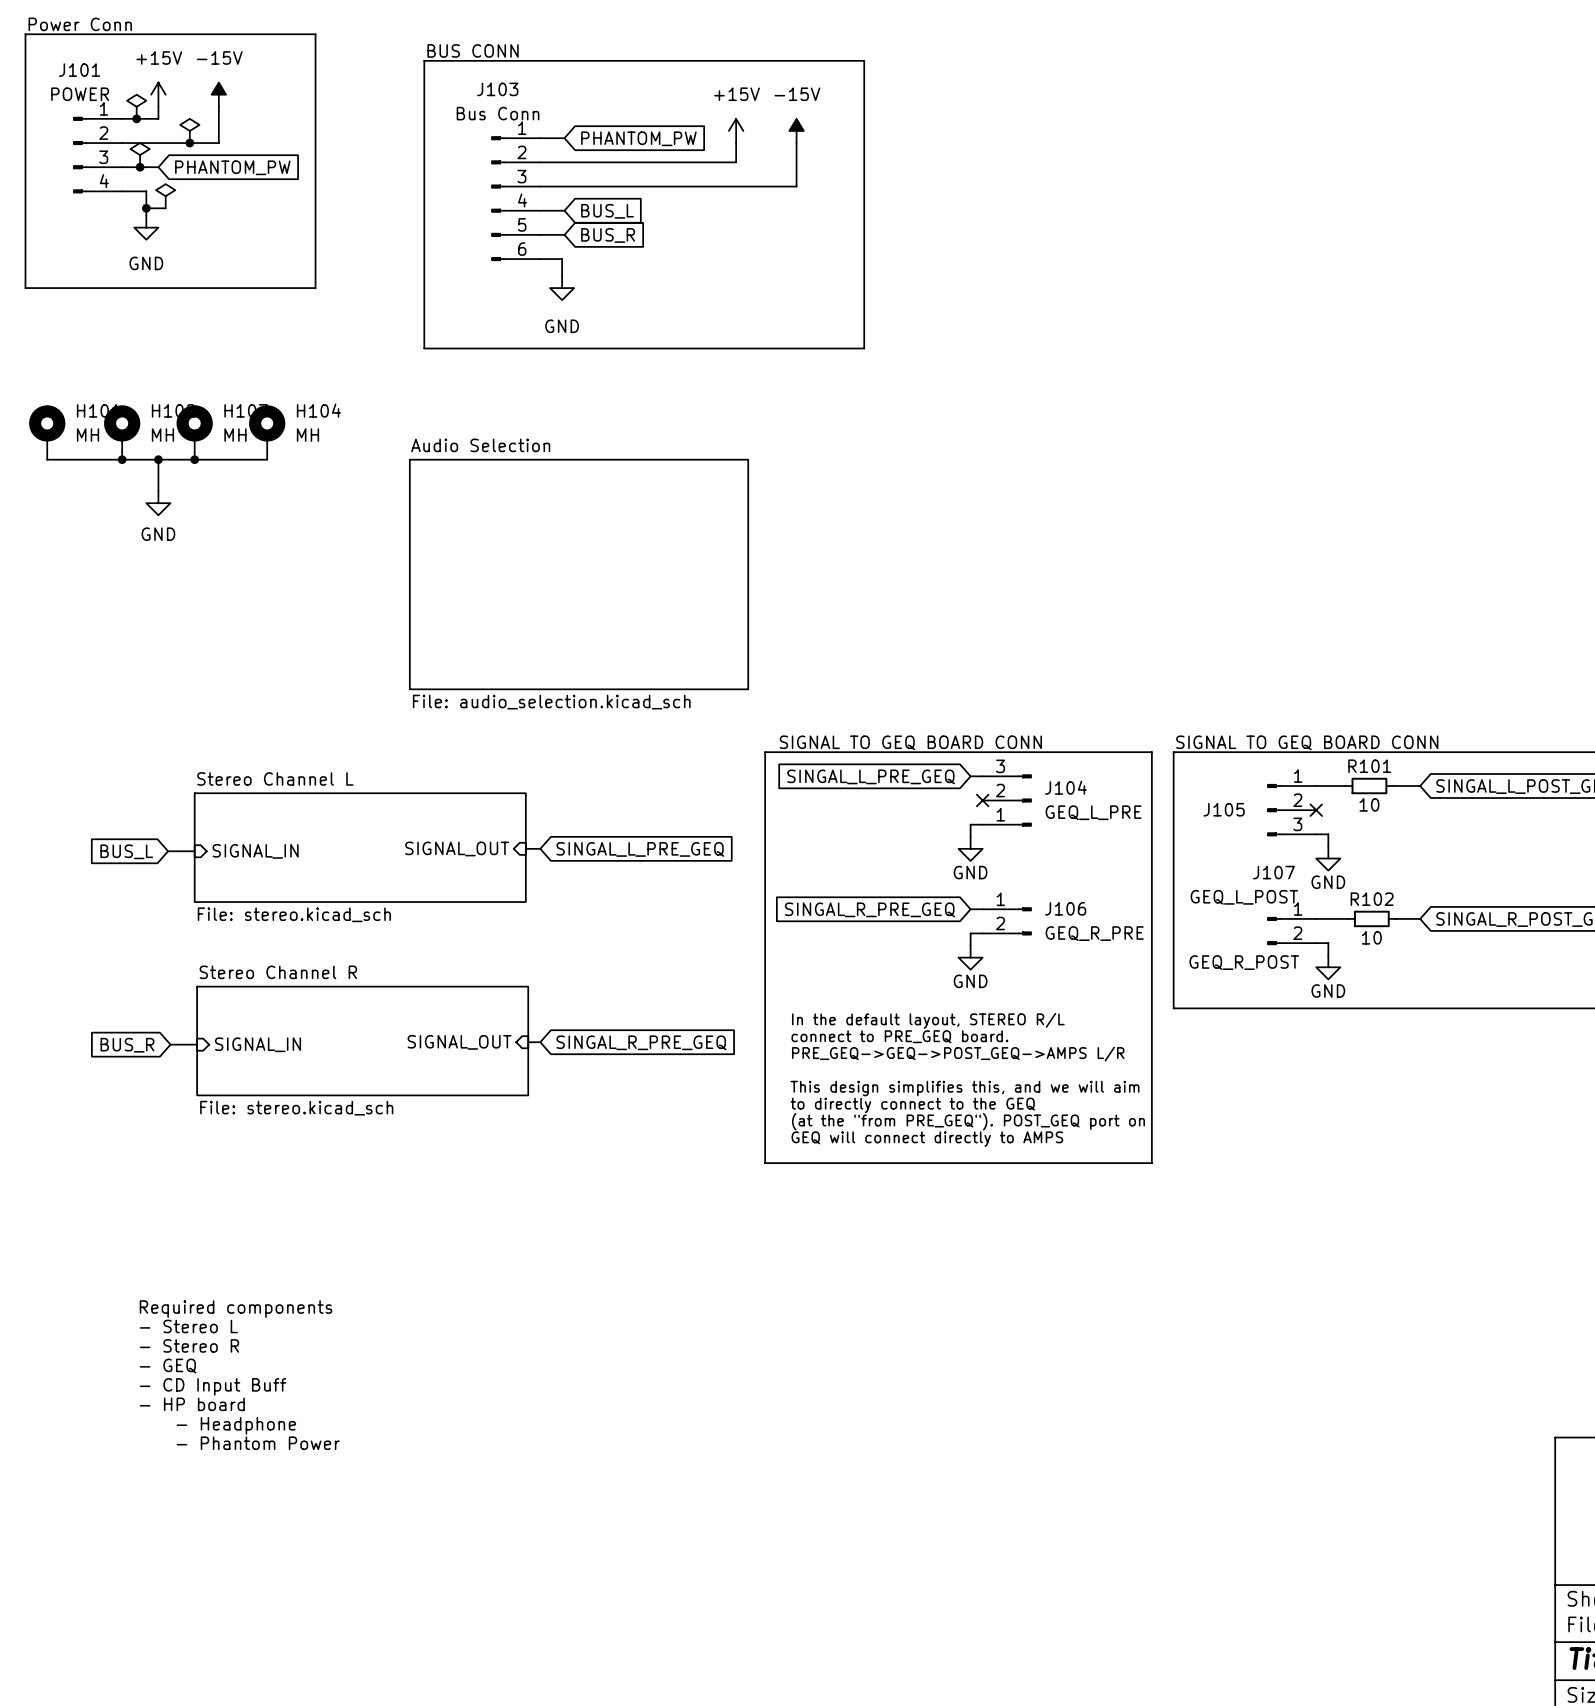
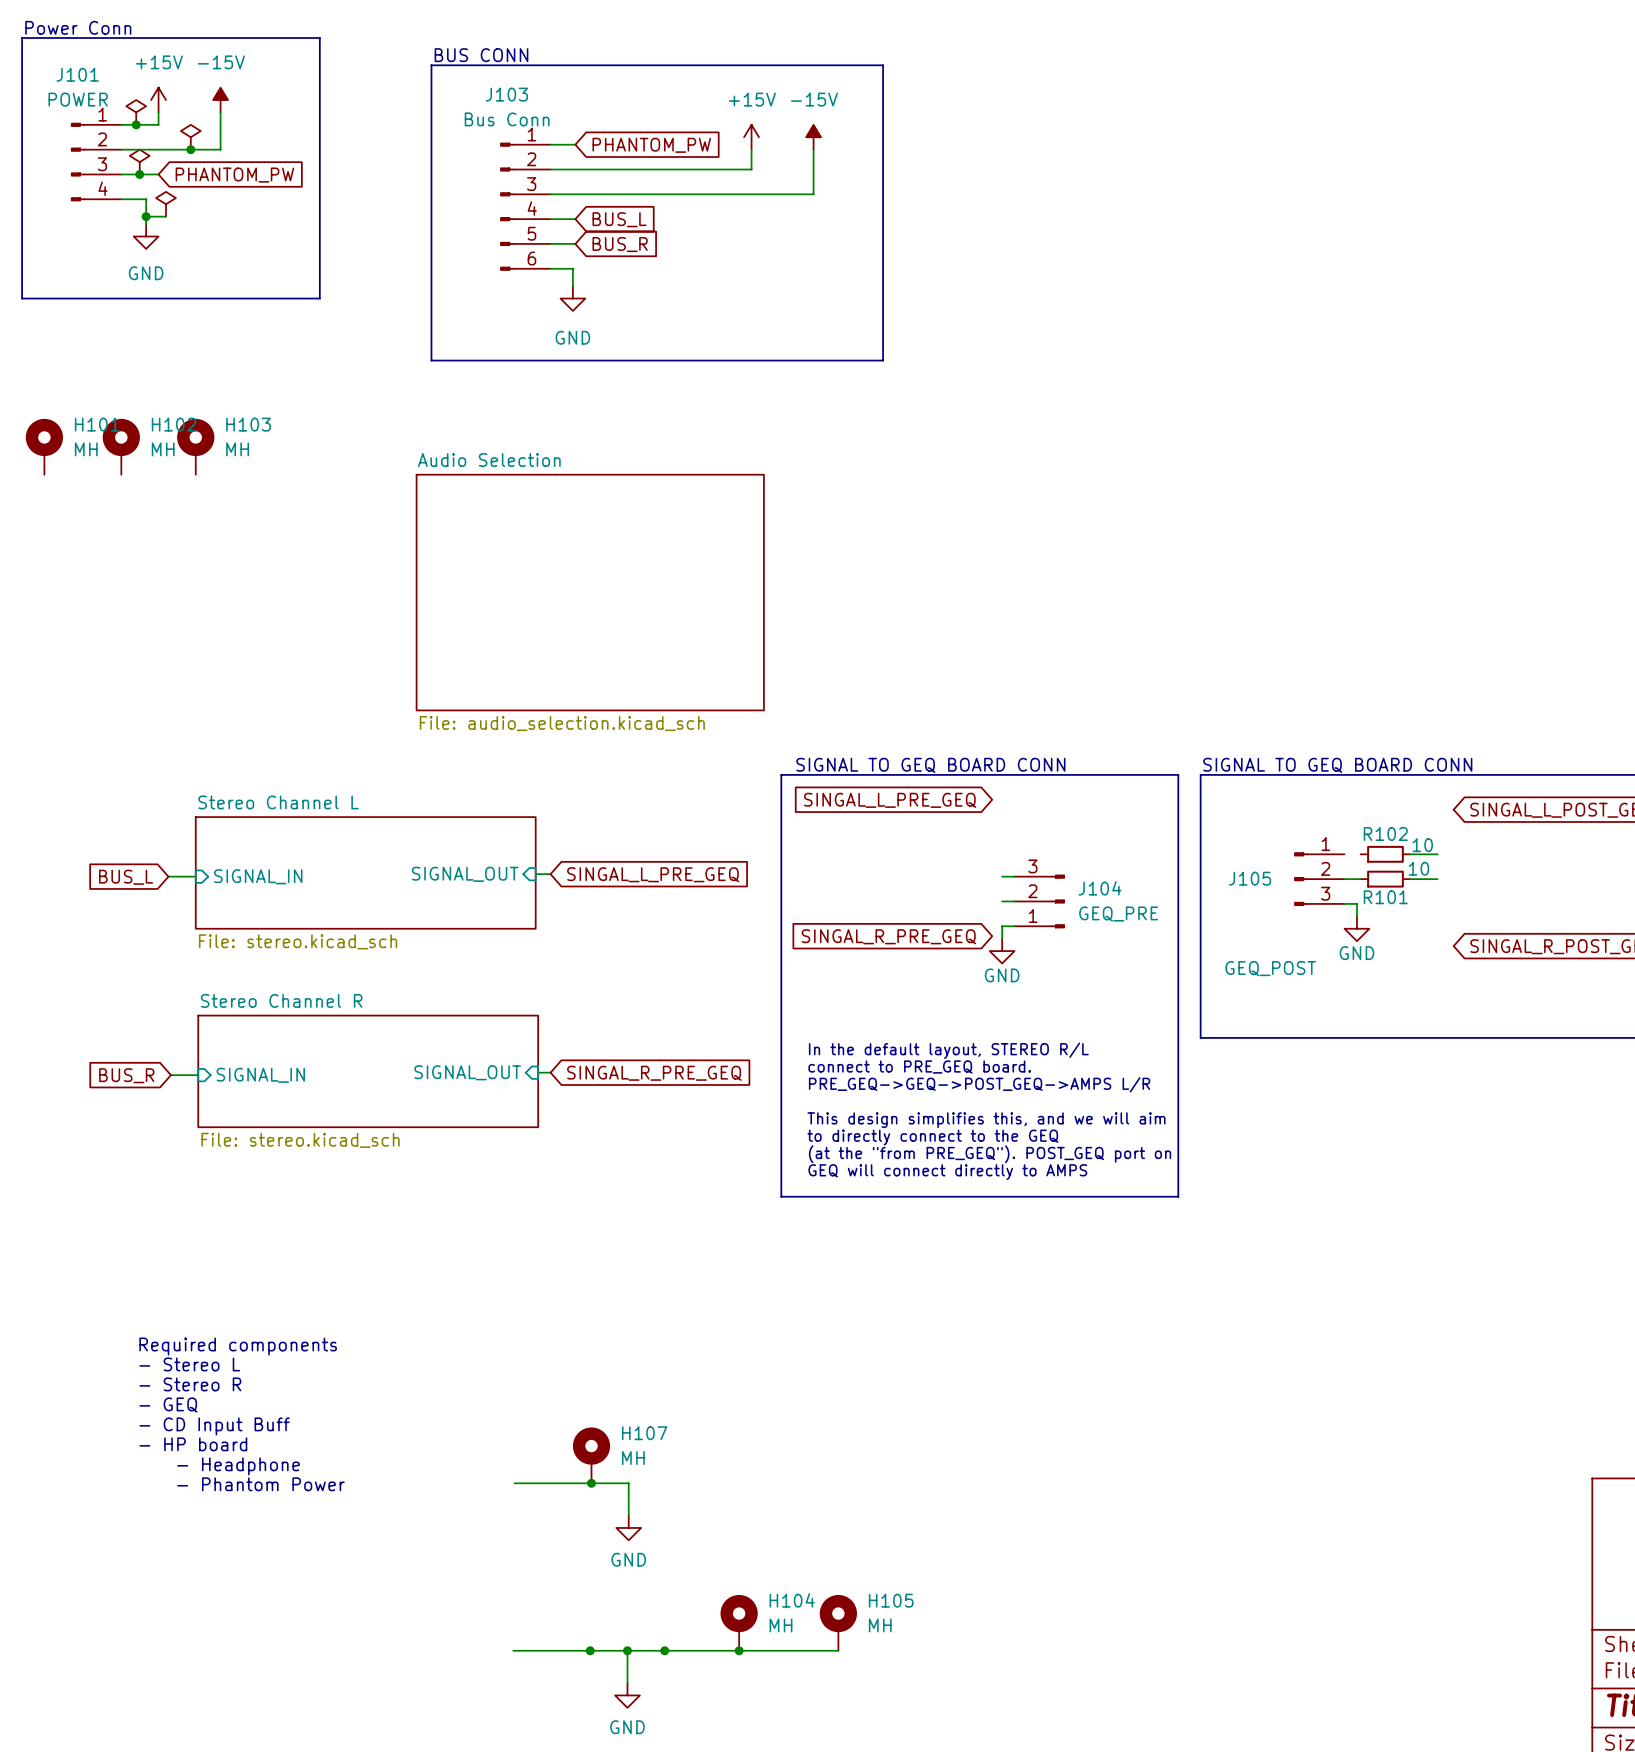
H104 position: (267, 432) -> (739, 1622)
wire: (47, 459) (267, 459) -> none
junction: (122, 459) -> none
wire: (158, 459) (158, 491) -> none
junction: (158, 459) -> none
junction: (194, 459) -> none
power symbol: GND (158, 503) -> none
R101 name position: R101 (1369, 766) -> R101 (1385, 897)
wire: (970, 776) (982, 776) -> (1002, 876) (1014, 876)
wire: (1316, 786) (1345, 786) -> none
R101 position: (1369, 786) -> (1385, 879)
wire: (1393, 786) (1420, 786) -> (1410, 854) (1437, 854)
no-connect mark: (982, 800) -> none
J104 position: (1007, 800) -> (1039, 901)
R101 value position: 10 (1369, 804) -> 10 (1418, 868)
J105 position: (1291, 810) -> (1319, 879)
no-connect mark: (1316, 810) -> none
J104 value: GEQ_L_PRE (1093, 812) -> GEQ_PRE (1118, 913)
wire: (982, 824) (970, 824) (970, 836) -> none
wire: (1316, 834) (1328, 834) (1328, 846) -> (1344, 903) (1356, 903) (1356, 916)
power symbol: GND (970, 848) -> none
wire: none -> (1344, 879) (1360, 879)
wire: none -> (1410, 879) (1437, 879)
power symbol: GND (1328, 858) -> none
J105 value: GEQ_L_POST (1244, 897) -> GEQ_POST (1270, 968)
power symbol: none -> GND (1356, 928)
wire: (970, 909) (982, 909) -> (1002, 901) (1014, 901)
wire: (1316, 918) (1347, 918) -> none
R102 position: (1371, 918) -> (1385, 854)
wire: (1396, 918) (1420, 918) -> none
J106: GEQ_R_PRE (1007, 921) -> none
J107: GEQ_R_POST (1291, 931) -> none
wire: (982, 933) (970, 933) (970, 945) -> (1014, 926) (1002, 926) (1002, 938)
R102 value position: 10 (1371, 937) -> 10 (1422, 845)
wire: (1316, 943) (1328, 943) (1328, 955) -> none
power symbol position: GND (970, 957) -> GND (1002, 951)
power symbol: GND (1328, 967) -> none
H107: none -> MH (591, 1455)
wire: none -> (514, 1483) (628, 1483) (628, 1515)
junction: none -> (591, 1483)
power symbol: none -> GND (628, 1527)
H105: none -> MH (838, 1622)
wire: none -> (513, 1650) (838, 1650)
junction: none -> (590, 1650)
wire: none -> (627, 1650) (627, 1683)
junction: none -> (627, 1650)
junction: none -> (664, 1650)
junction: none -> (739, 1650)
power symbol: none -> GND (627, 1695)

